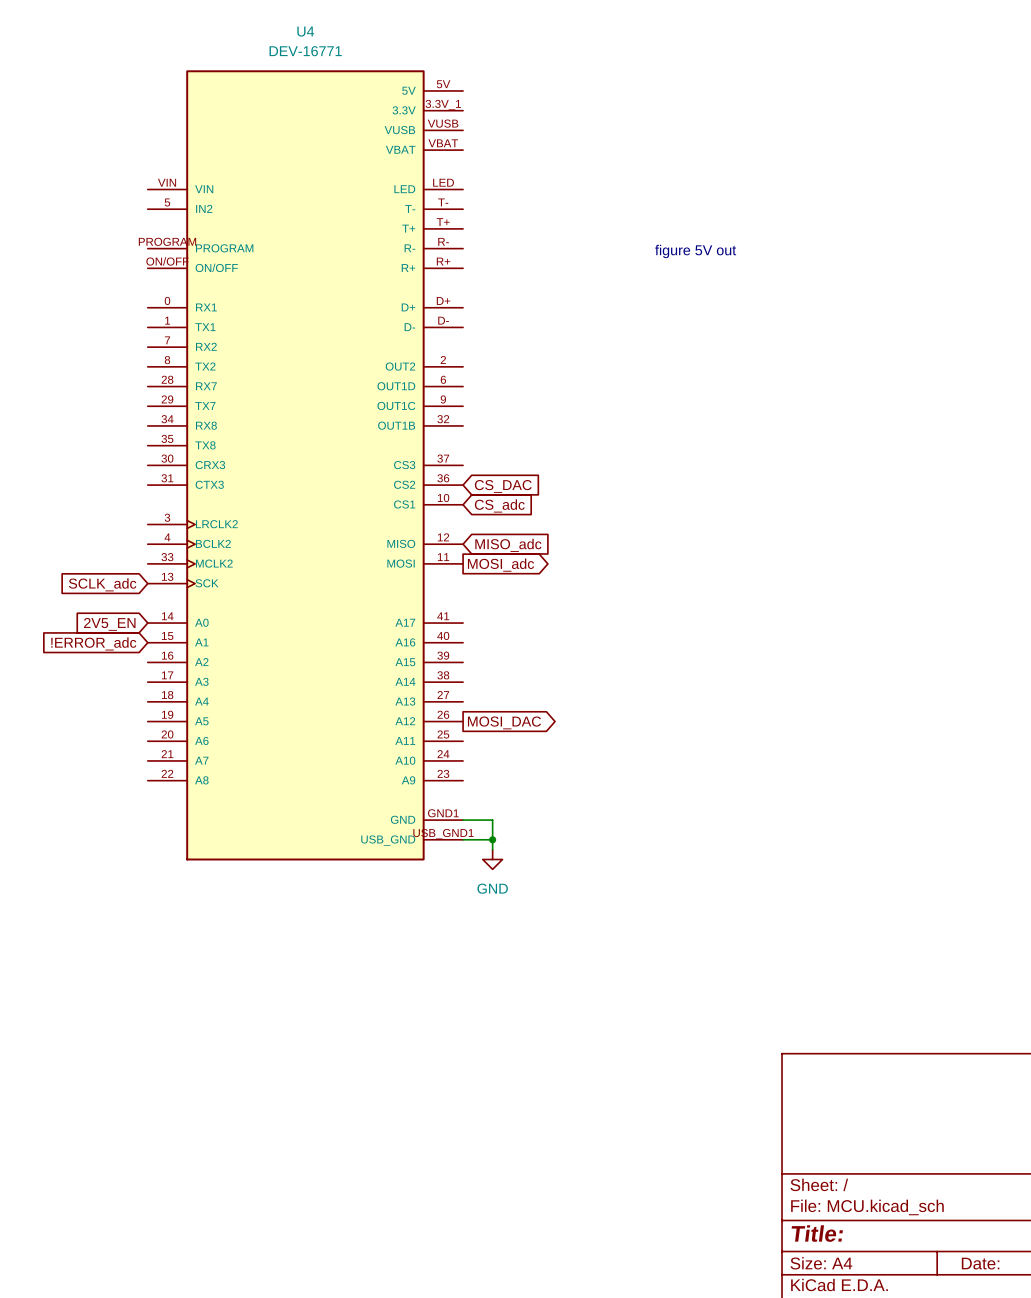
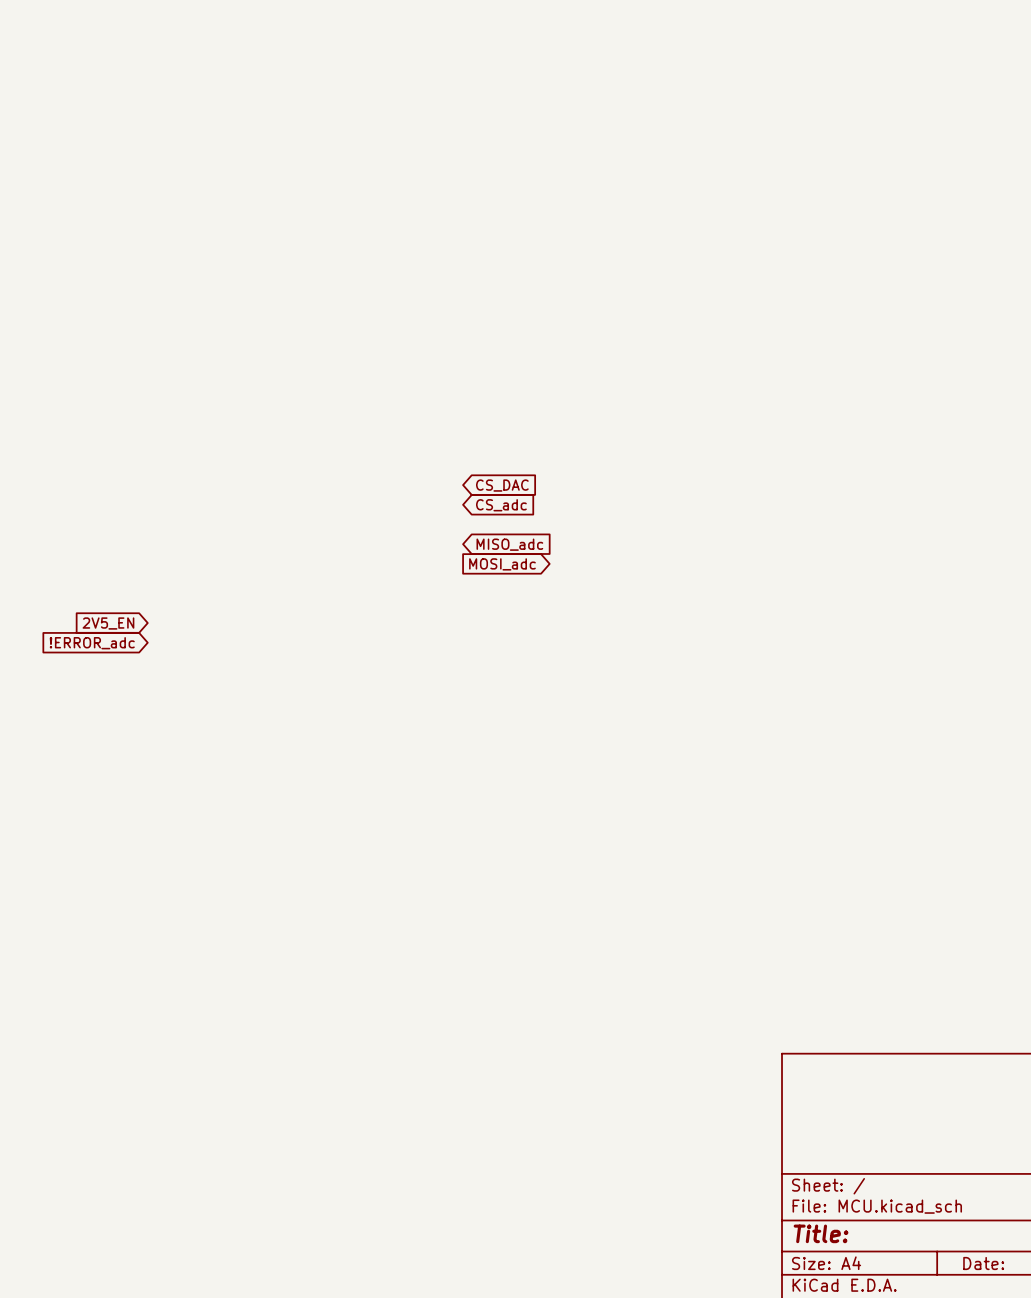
text: figure 5V out (695, 251) -> none
U4: DEV-16771 (305, 465) -> none
global label: SCLK_adc (102, 584) -> none
global label: MOSI_DAC (504, 722) -> none
wire: (463, 820) (492, 820) (492, 849) -> none
wire: (463, 839) (492, 839) -> none
junction: (492, 839) -> none
power symbol: GND (492, 859) -> none

